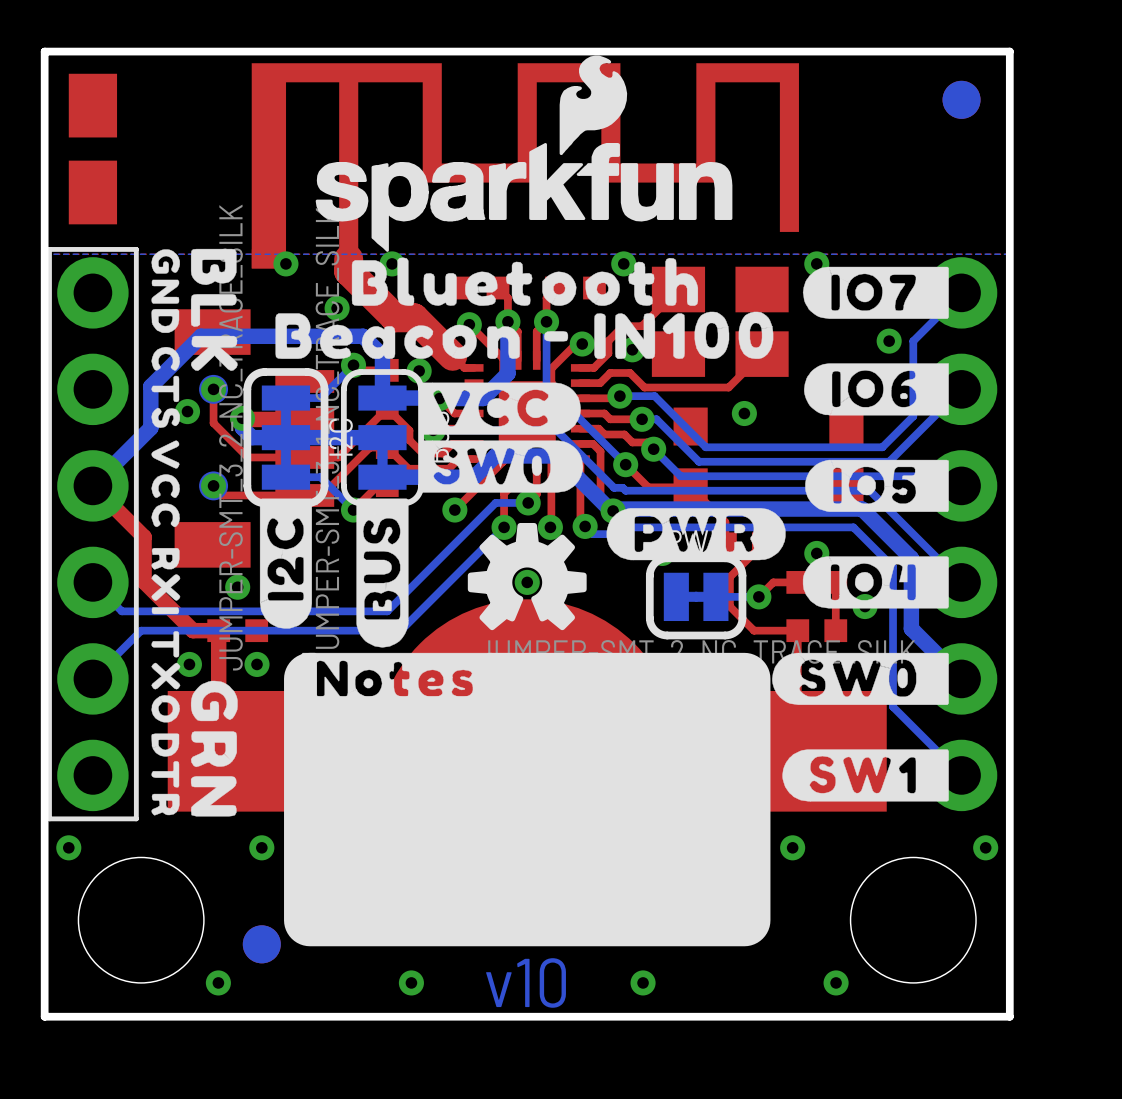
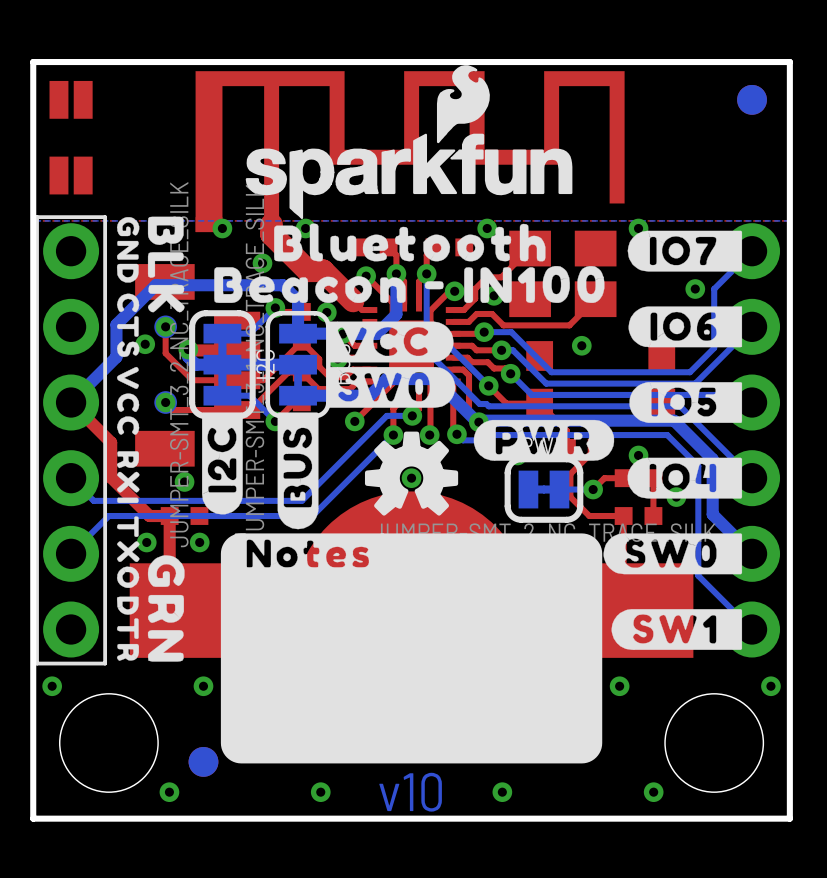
part footprint: [68, 73, 118, 138] -> [49, 80, 93, 119]
part footprint: [68, 160, 118, 225] -> [49, 156, 93, 195]

